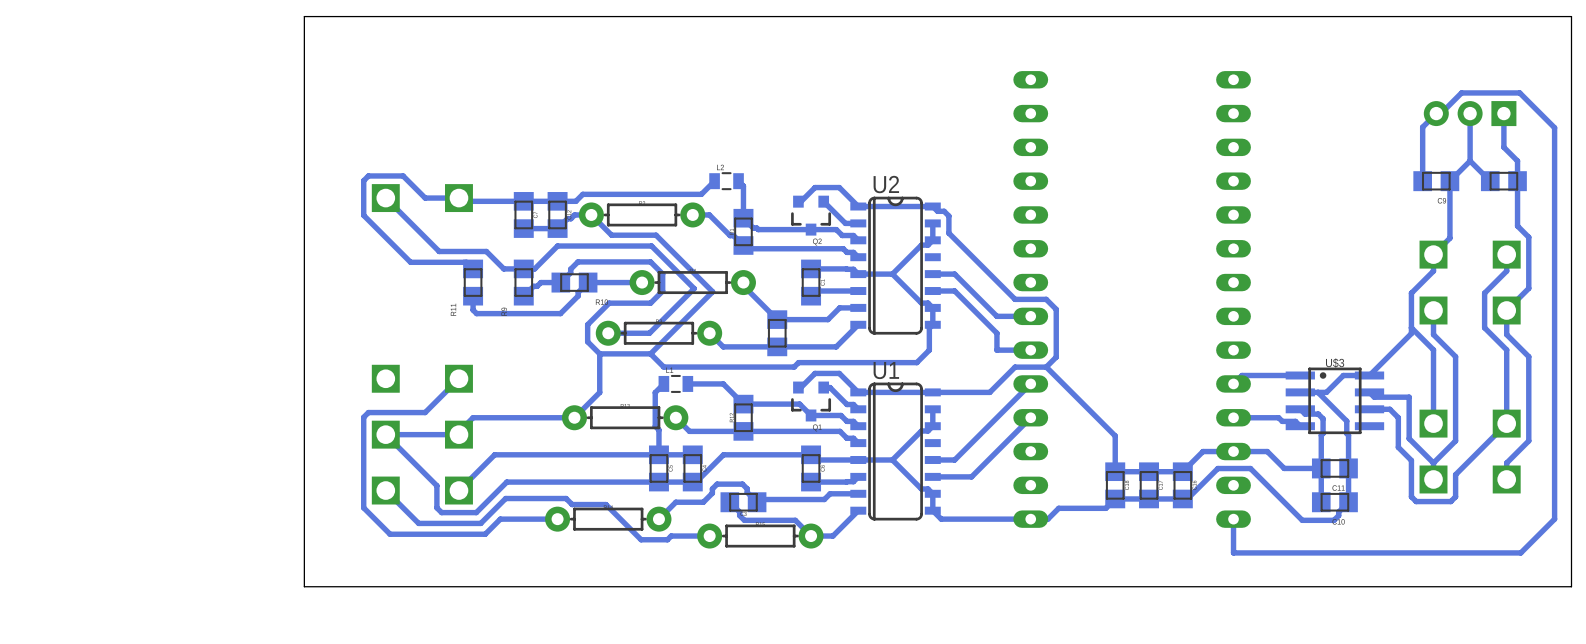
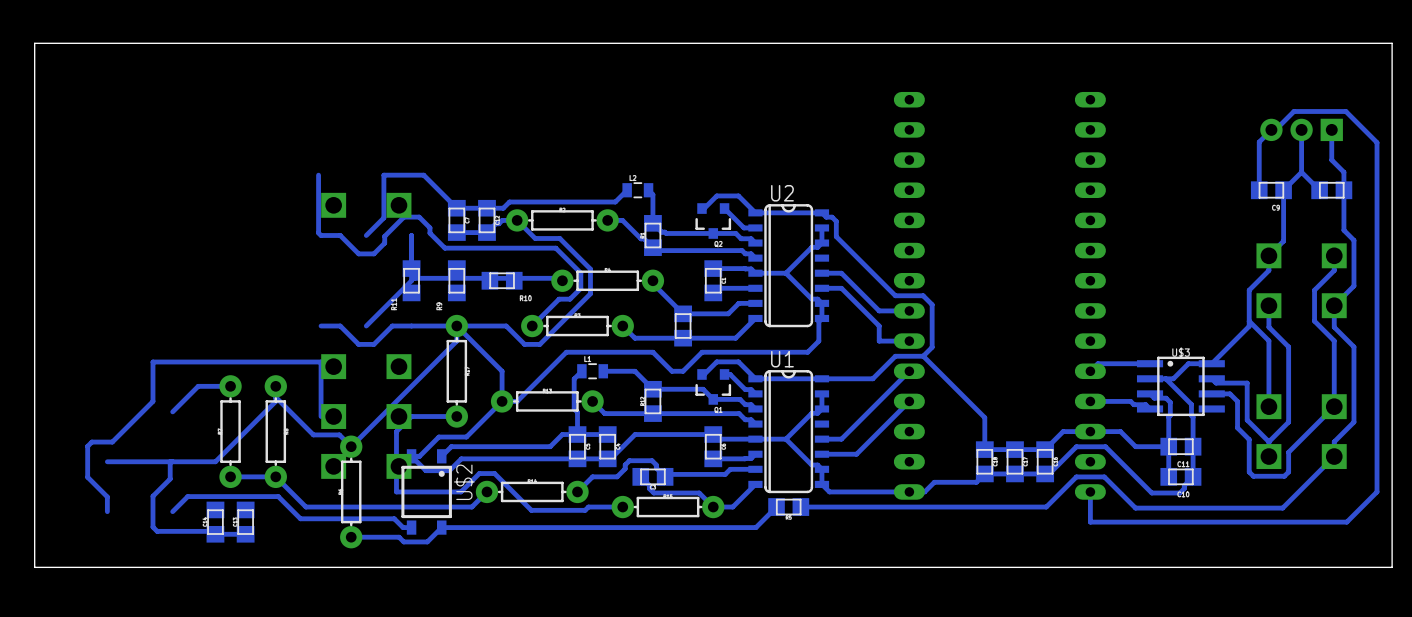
board edge: (304, 16) (304, 586) (1571, 586) -> (260, 43) (34, 43) (34, 567) (1392, 567) (1392, 552)
bottom track: (385, 198) (439, 251) (486, 251) (503, 268) (534, 268) (557, 246) -> (318, 175) (318, 233) (321, 235) (340, 235) (358, 253) (373, 253) (384, 243) (384, 236) (403, 217) (419, 217) (429, 227) (429, 233) (444, 248) (486, 248)
bottom track: (523, 201) (462, 201) (458, 198) (425, 198) (403, 175) (368, 175) (363, 180) (363, 215) (410, 262) (466, 262) (473, 268) -> (456, 208) (423, 175) (383, 175) (383, 217) (366, 235)
bottom track: none -> (411, 235) (411, 280) (366, 326)
bottom track: (639, 235) (656, 235) (712, 291) (650, 353) -> (559, 238) (590, 269) (590, 293) (539, 344)
bottom track: (634, 246) (651, 246) (694, 288) (649, 333) (608, 333) -> (555, 248) (570, 262)
bottom track: (650, 261) (577, 261) (560, 282) (540, 282) (537, 286) (533, 286) (523, 296) -> none
bottom track: (642, 282) (588, 282) (560, 313) (476, 313) (473, 310) (473, 296) -> (562, 280) (559, 278) (414, 278) (411, 275)
bottom track: (638, 303) (609, 303) (587, 324) (587, 341) -> (559, 299) (532, 326)
bottom track: none -> (321, 326) (340, 326) (358, 344) (373, 344) (392, 326) (506, 326) (513, 333)
bottom track: (599, 353) (599, 392) (574, 417) (473, 417) (456, 434) -> none
bottom track: (650, 353) (663, 367) (794, 367) -> (502, 401) (517, 401) (566, 352) (652, 352) (671, 371) (683, 371) (698, 356)
bottom track: (650, 353) (616, 353) -> none
bottom track: (458, 378) (425, 412) (368, 412) (363, 417) (363, 507) (390, 534) (485, 534) (500, 519) -> (456, 416) (411, 416) (396, 431) (396, 491) (435, 491)
part: none -> (456, 371)
bottom track: none -> (230, 386) (198, 386) (172, 411)
bottom track: none -> (275, 386) (275, 401) (215, 461) (107, 461)
bottom track: none -> (275, 397) (313, 434) (339, 434) (351, 446) (456, 341) (456, 326) (502, 371) (502, 401)
bottom track: none -> (321, 416) (321, 362) (152, 362) (152, 401) (112, 442) (91, 442) (87, 446) (87, 477) (107, 496) (107, 511)
bottom track: (458, 434) (385, 434) (436, 485) (436, 507) (441, 512) (476, 512) (506, 482) (528, 482) -> (502, 401) (466, 437) (438, 437) (419, 456) (411, 456) (425, 470) (449, 470) (461, 458)
part: none -> (230, 431)
part: none -> (275, 431)
bottom track: (642, 454) (494, 454) (458, 490) -> (562, 434) (550, 446) (451, 446) (441, 456)
bottom track: none -> (1334, 456) (1282, 508) (1135, 508) (1104, 476) (1076, 476) (1046, 507) (800, 507)
bottom track: none -> (170, 461) (170, 478) (152, 496) (152, 527) (157, 531) (212, 531) (215, 534) (245, 534)
bottom track: (385, 490) (418, 523) (480, 523) (505, 498) (549, 498) -> none
bottom track: none -> (230, 476) (275, 476) (305, 507) (471, 507) (486, 491)
bottom track: (572, 504) (605, 504) (641, 539) -> (500, 478) (531, 510) (561, 510)
part: none -> (351, 491)
U$2: none -> (426, 491)
bottom track: (557, 519) (528, 519) -> (479, 473) (460, 491)
bottom track: none -> (776, 507) (755, 527) (441, 527) (427, 541) (403, 541) (399, 537) (351, 537)
part: none -> (788, 507)
bottom track: none -> (172, 511) (187, 496) (278, 496) (300, 518) (394, 518) (403, 527) (411, 527)
part: none -> (215, 522)
part: none -> (245, 522)

